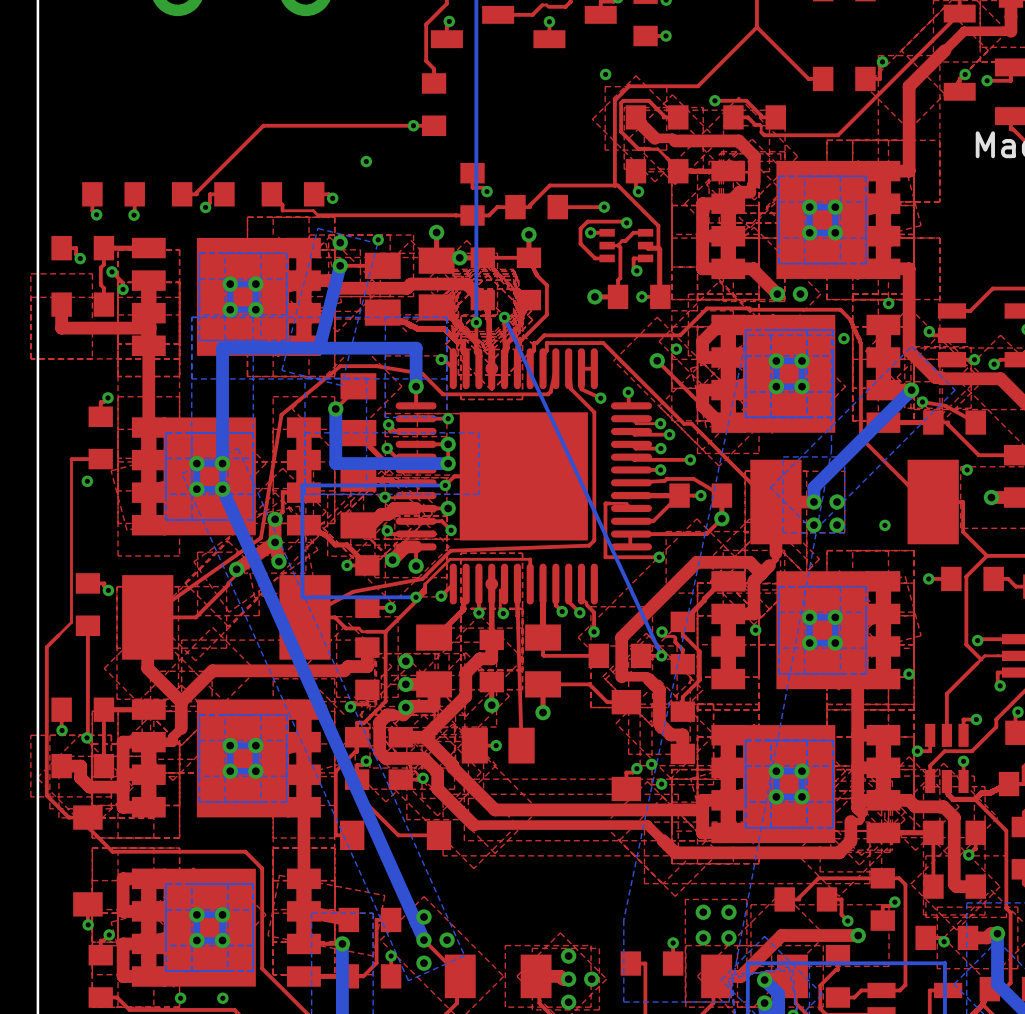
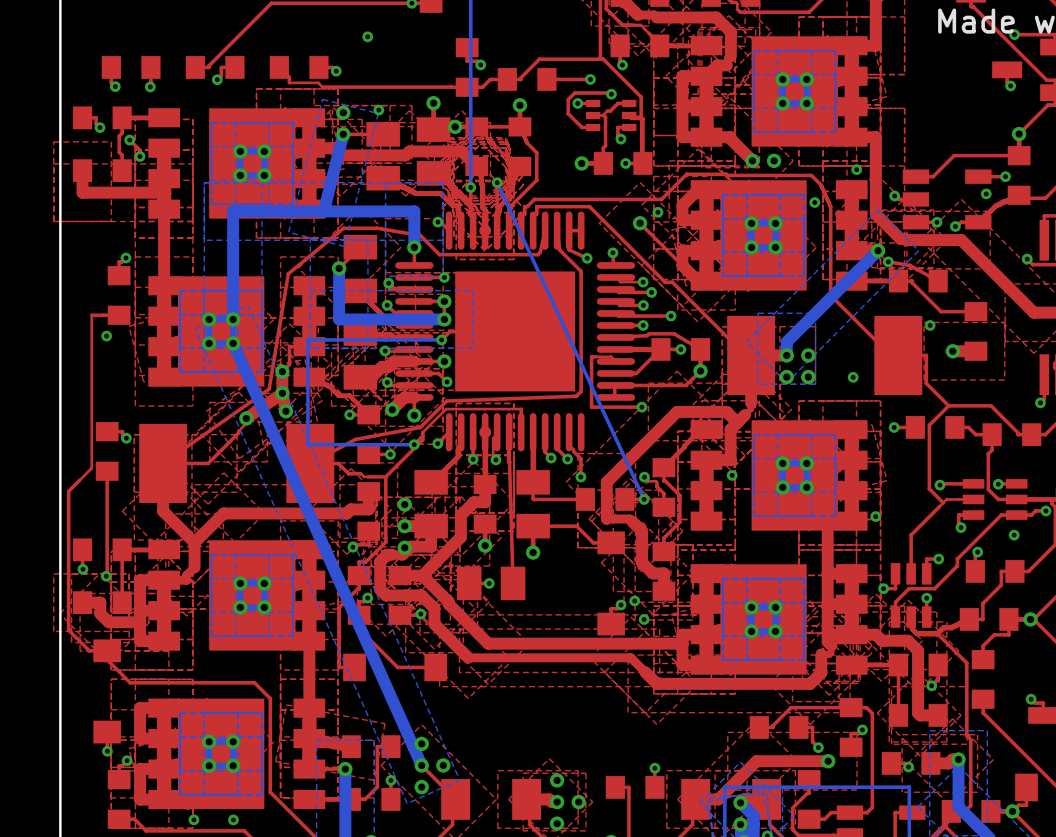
bottom zone outline: (831, 335) (746, 335) (623, 919) (623, 1002) (728, 1002) (831, 450) (831, 335) -> none
top zone outline: (746, 899) (685, 899) (685, 1002) (746, 1002) (746, 899) -> none
via: (703, 912) -> none
via: (728, 912) -> none
via: (703, 937) -> none
via: (728, 937) -> none

